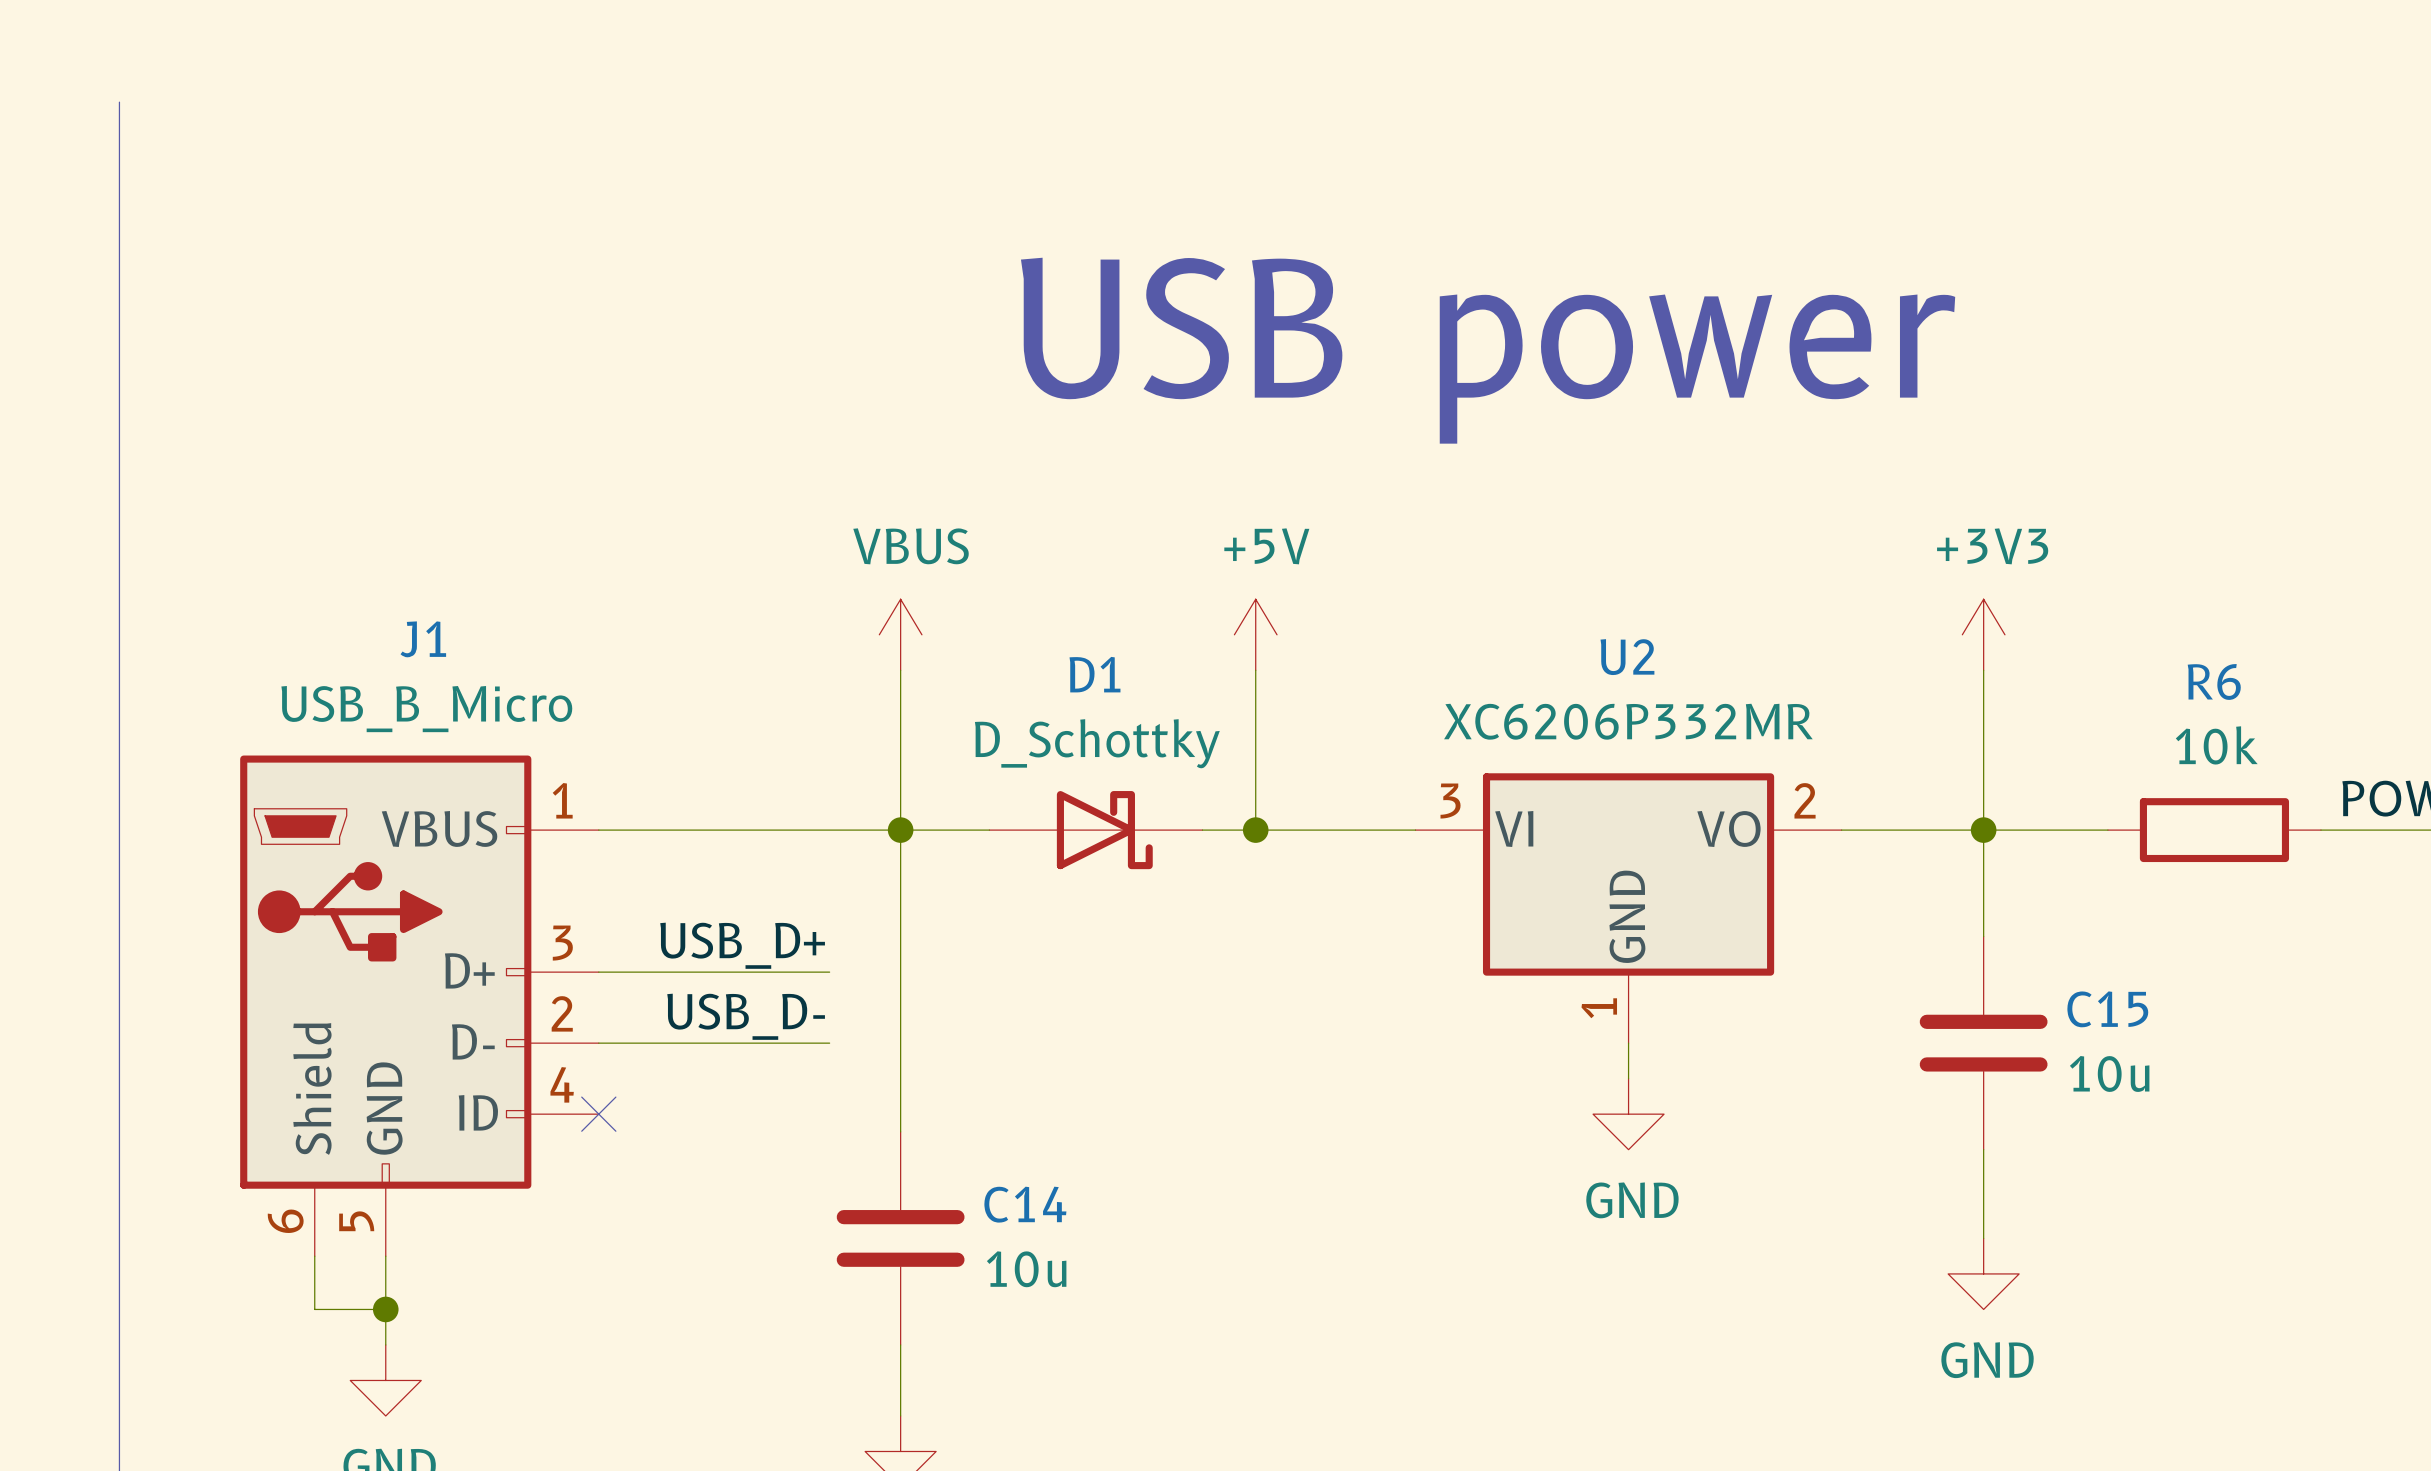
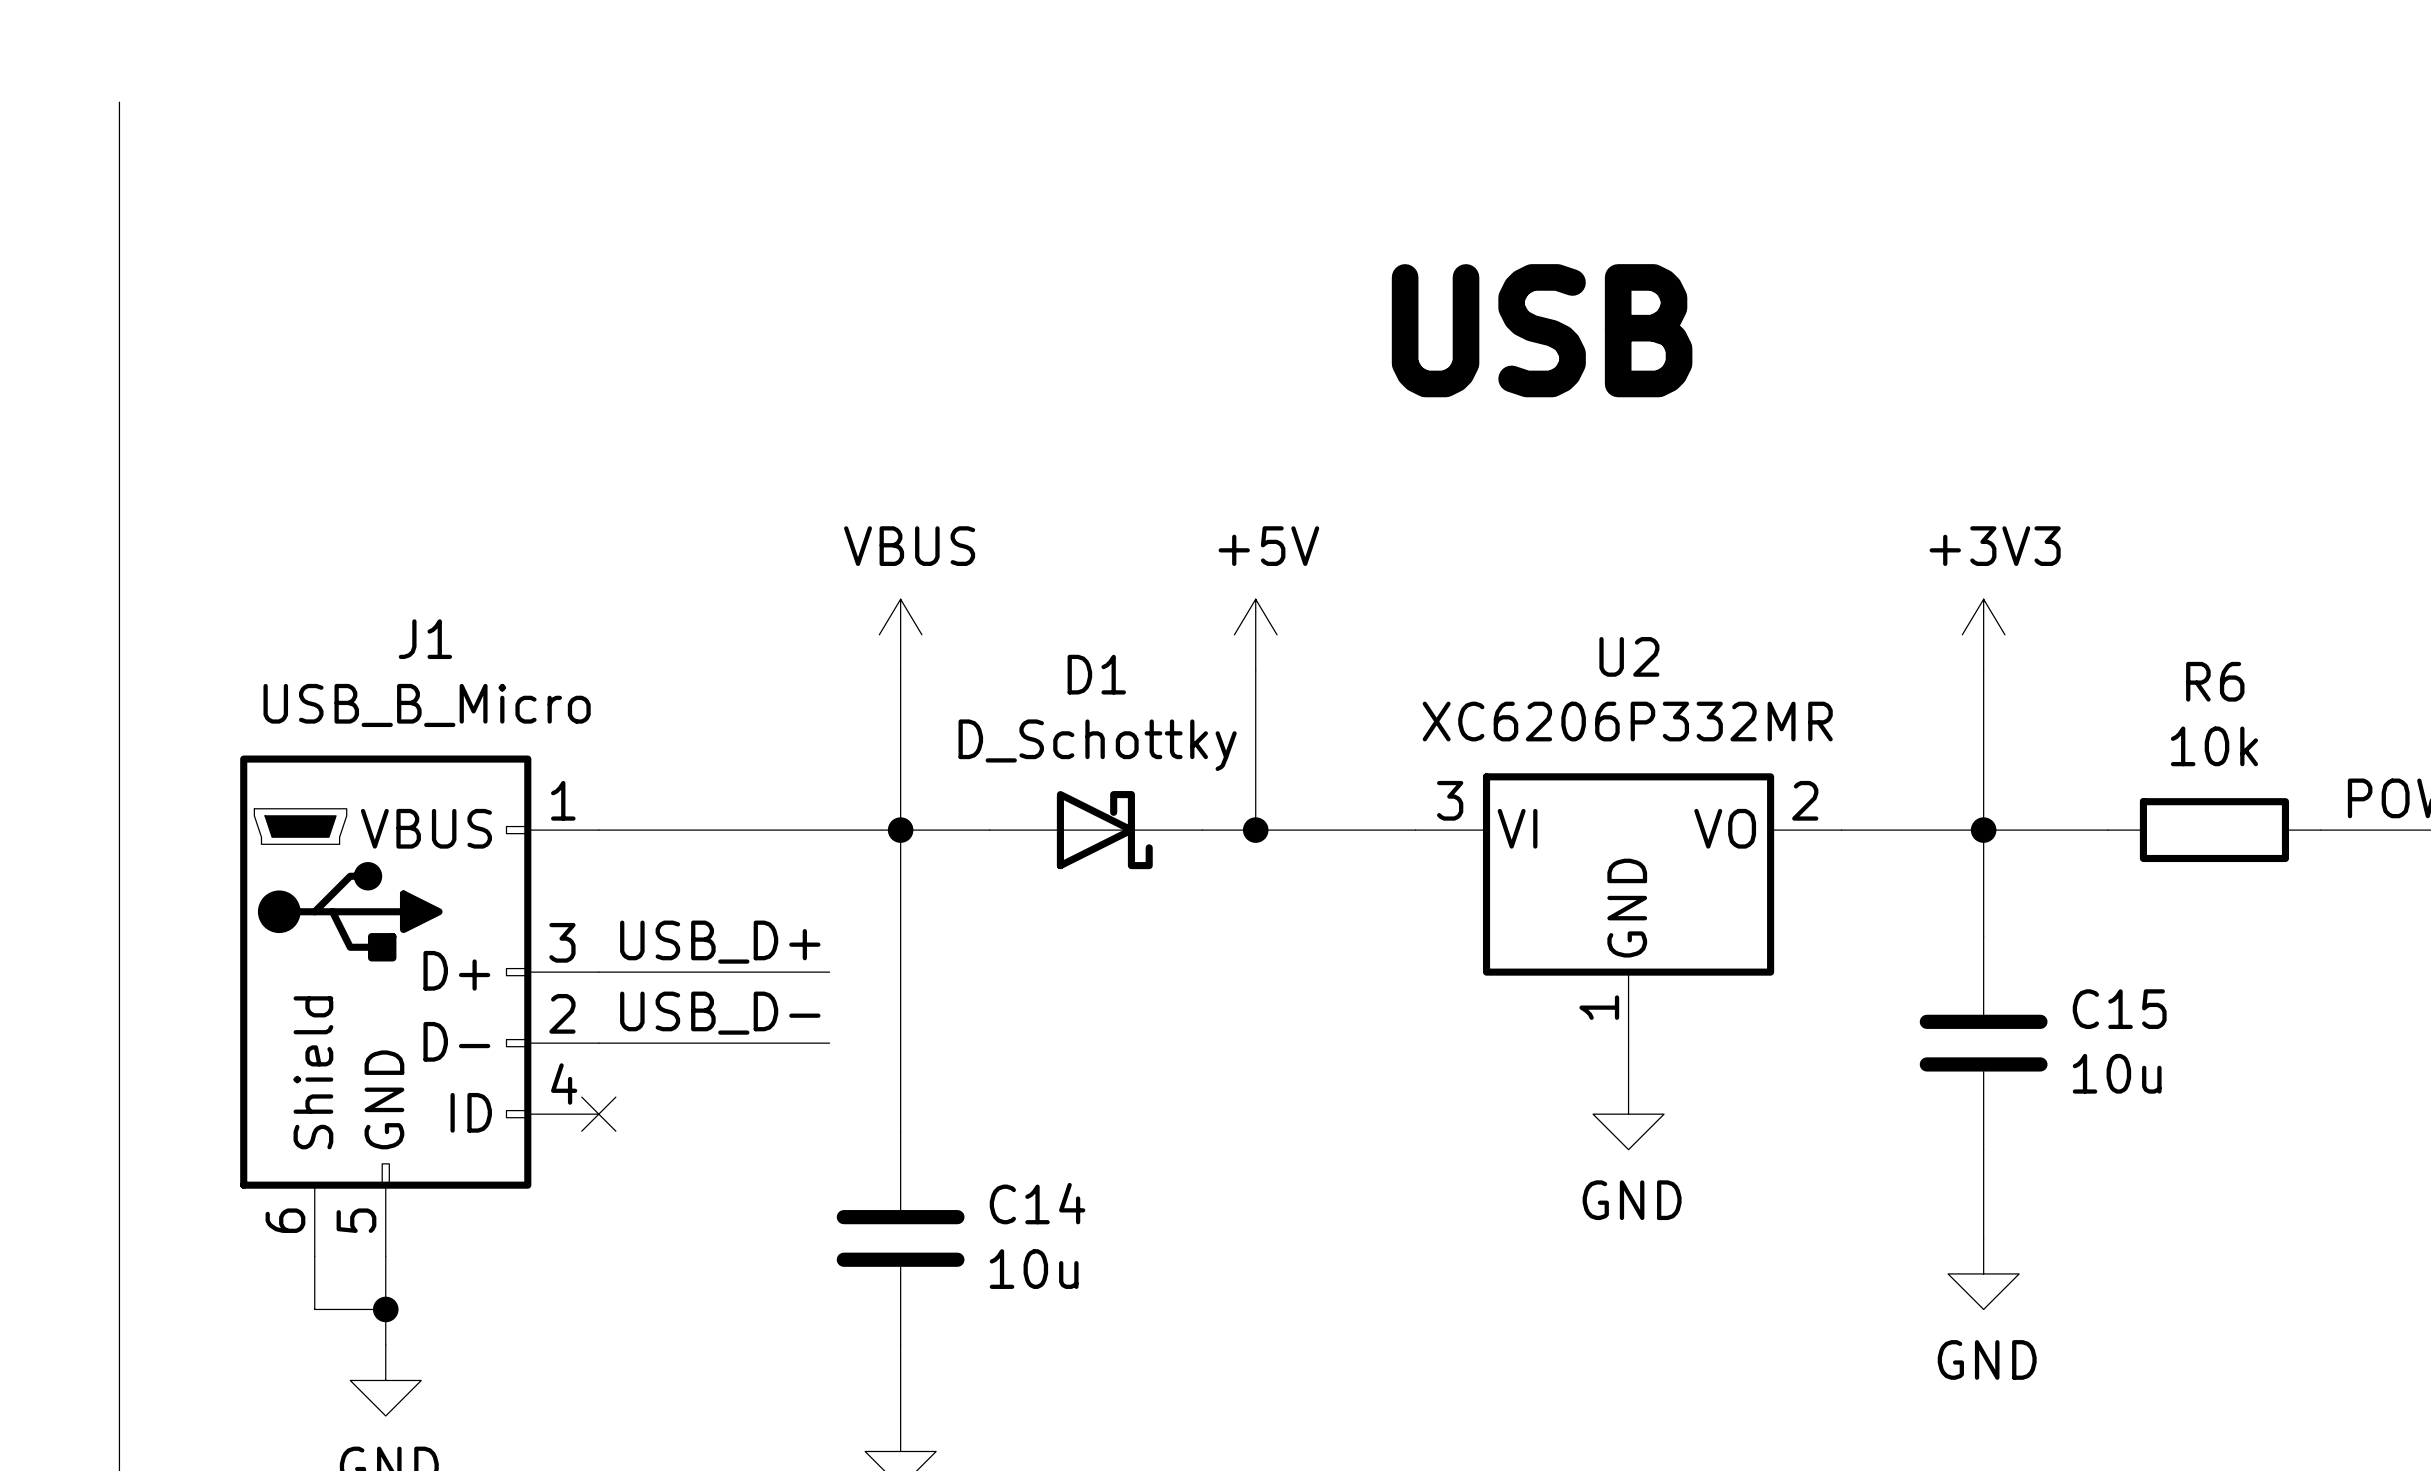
text: none -> USB (1542, 330)
text: USB power (1488, 350) -> none

